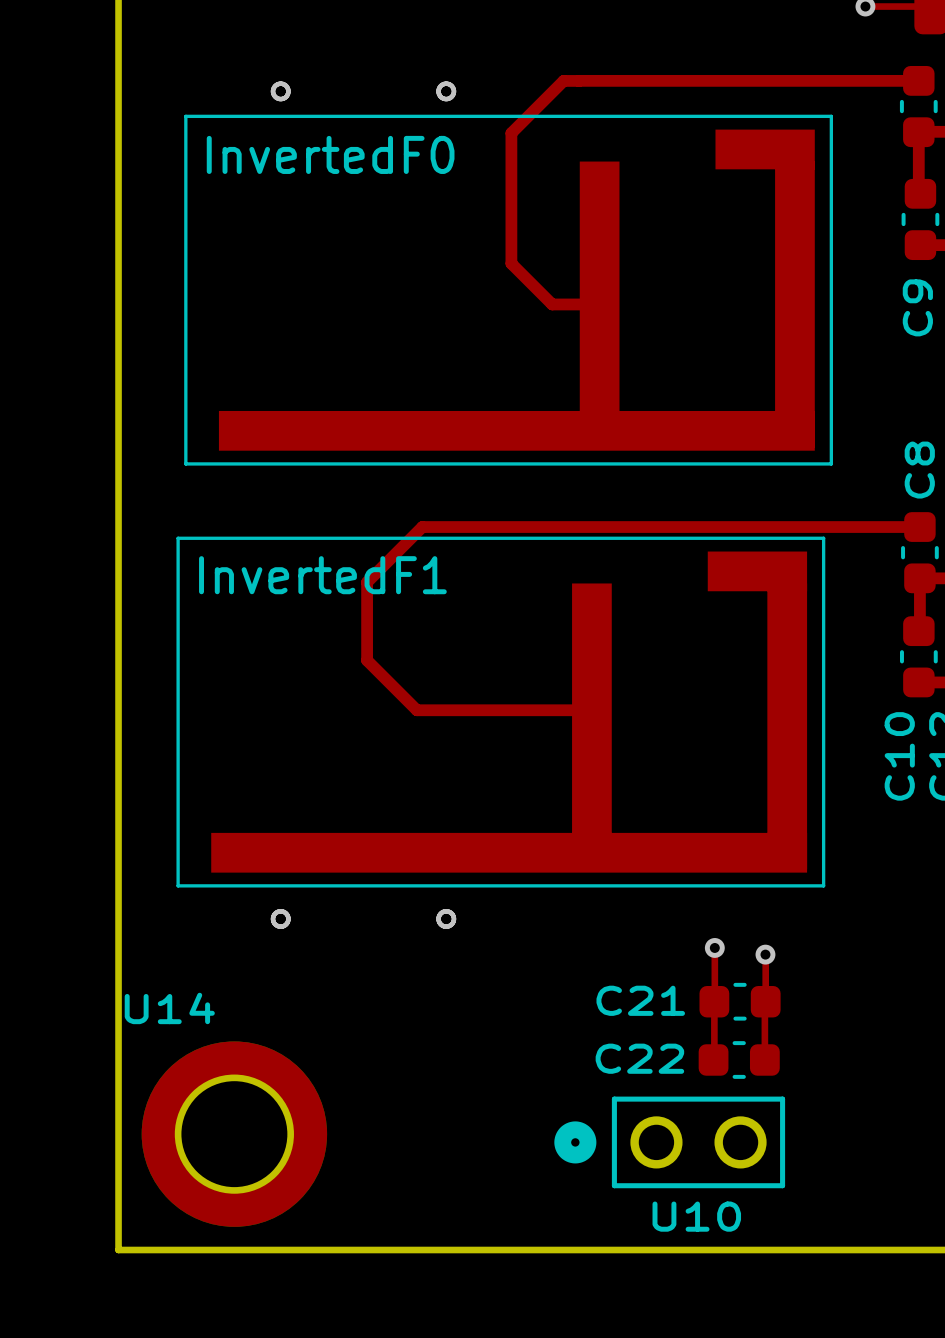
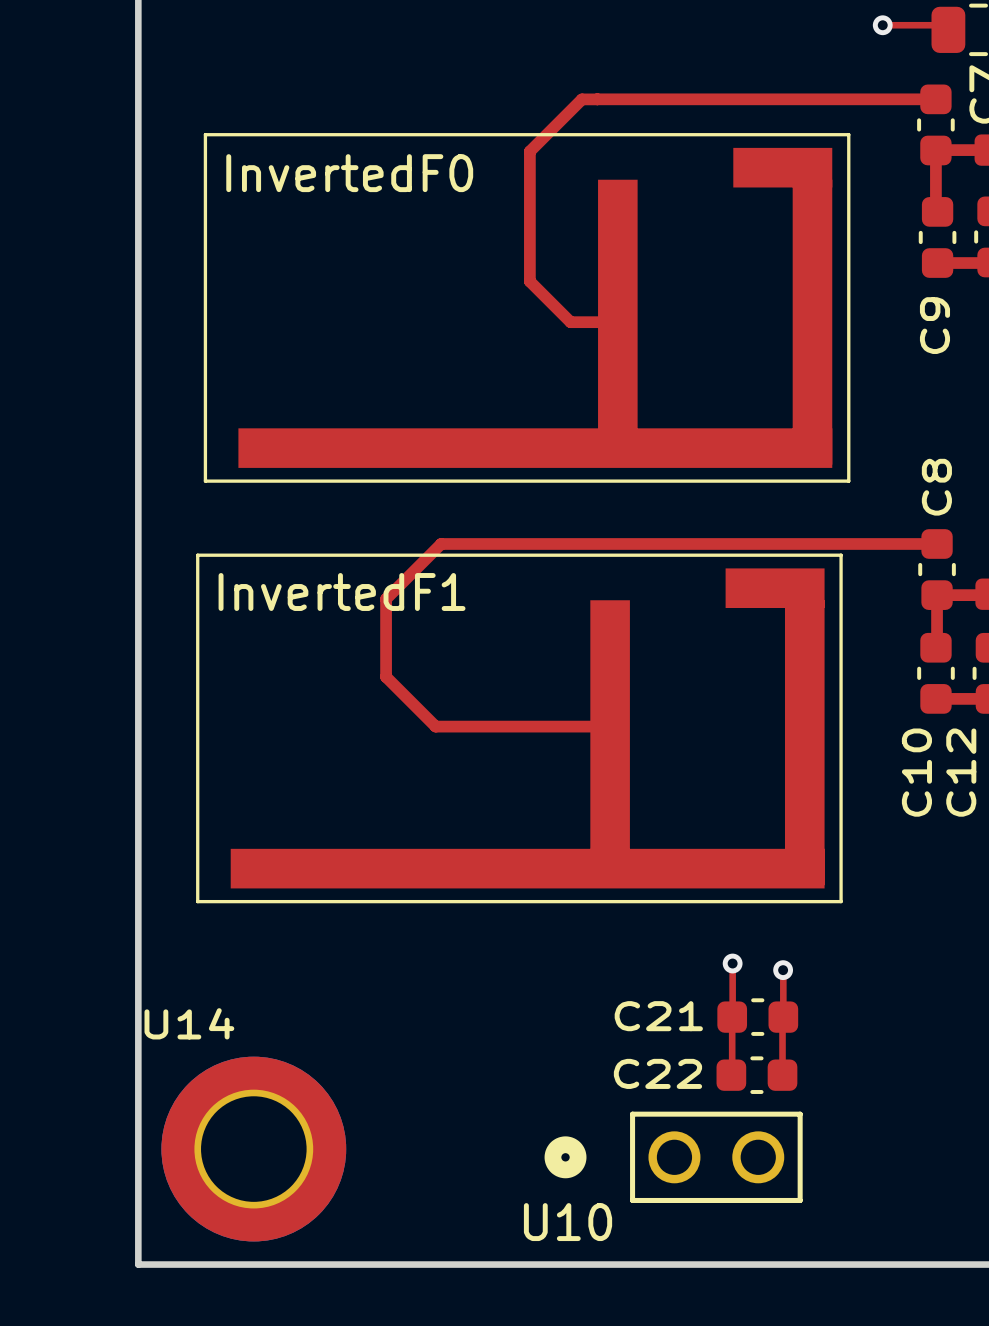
via: (280, 91) -> none
via: (446, 91) -> none
via: (280, 918) -> none
via: (446, 918) -> none
U10 footprint: [554, 1096, 786, 1189] -> [544, 1111, 803, 1203]
U10 name position: U10 (696, 1216) -> U10 (568, 1222)

